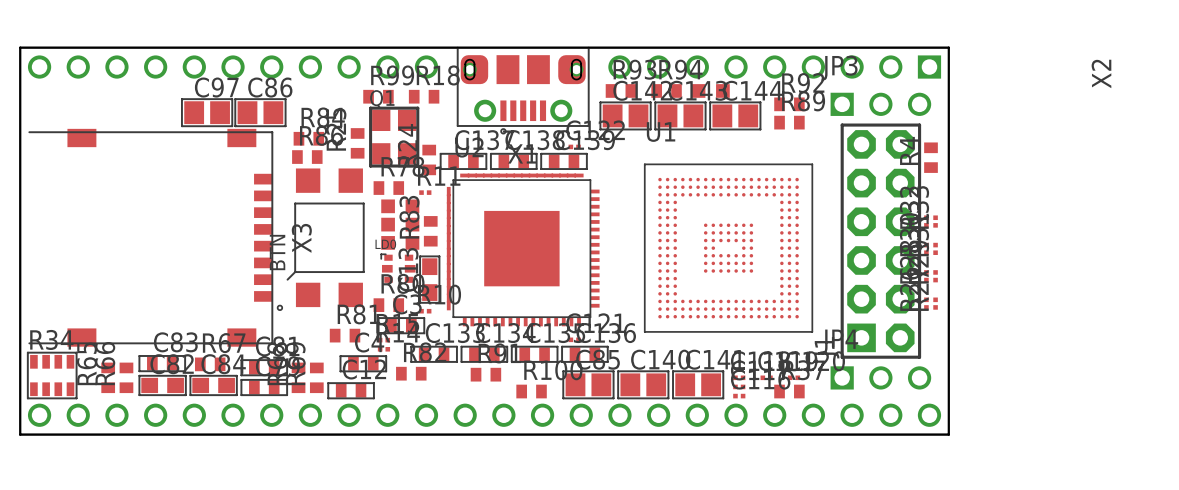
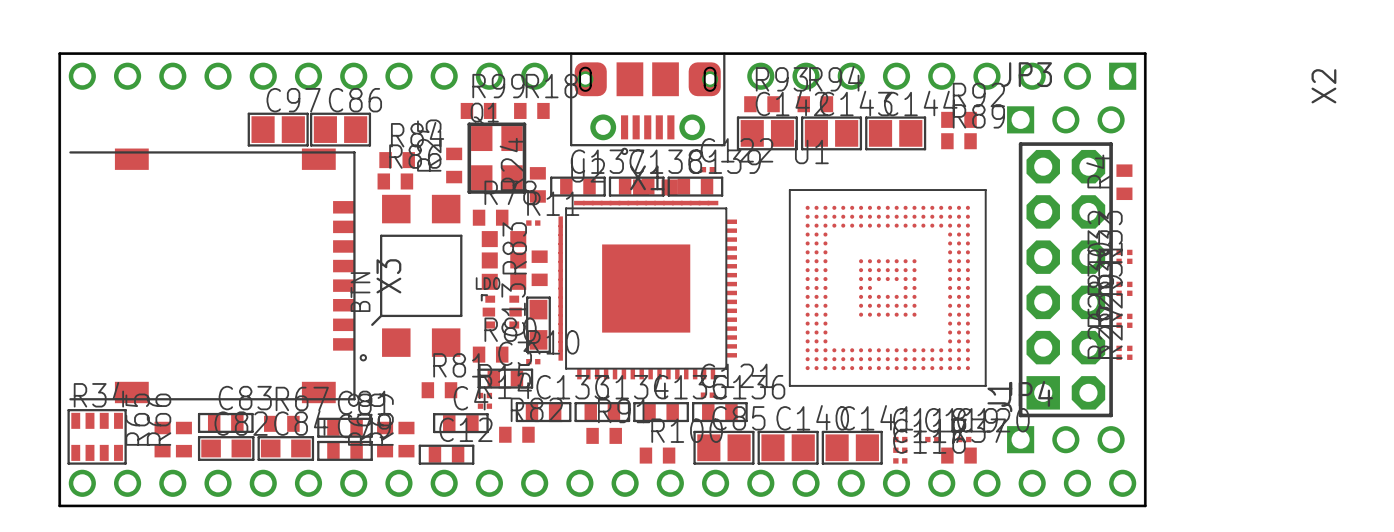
part position: (710, 90) -> (655, 187)

